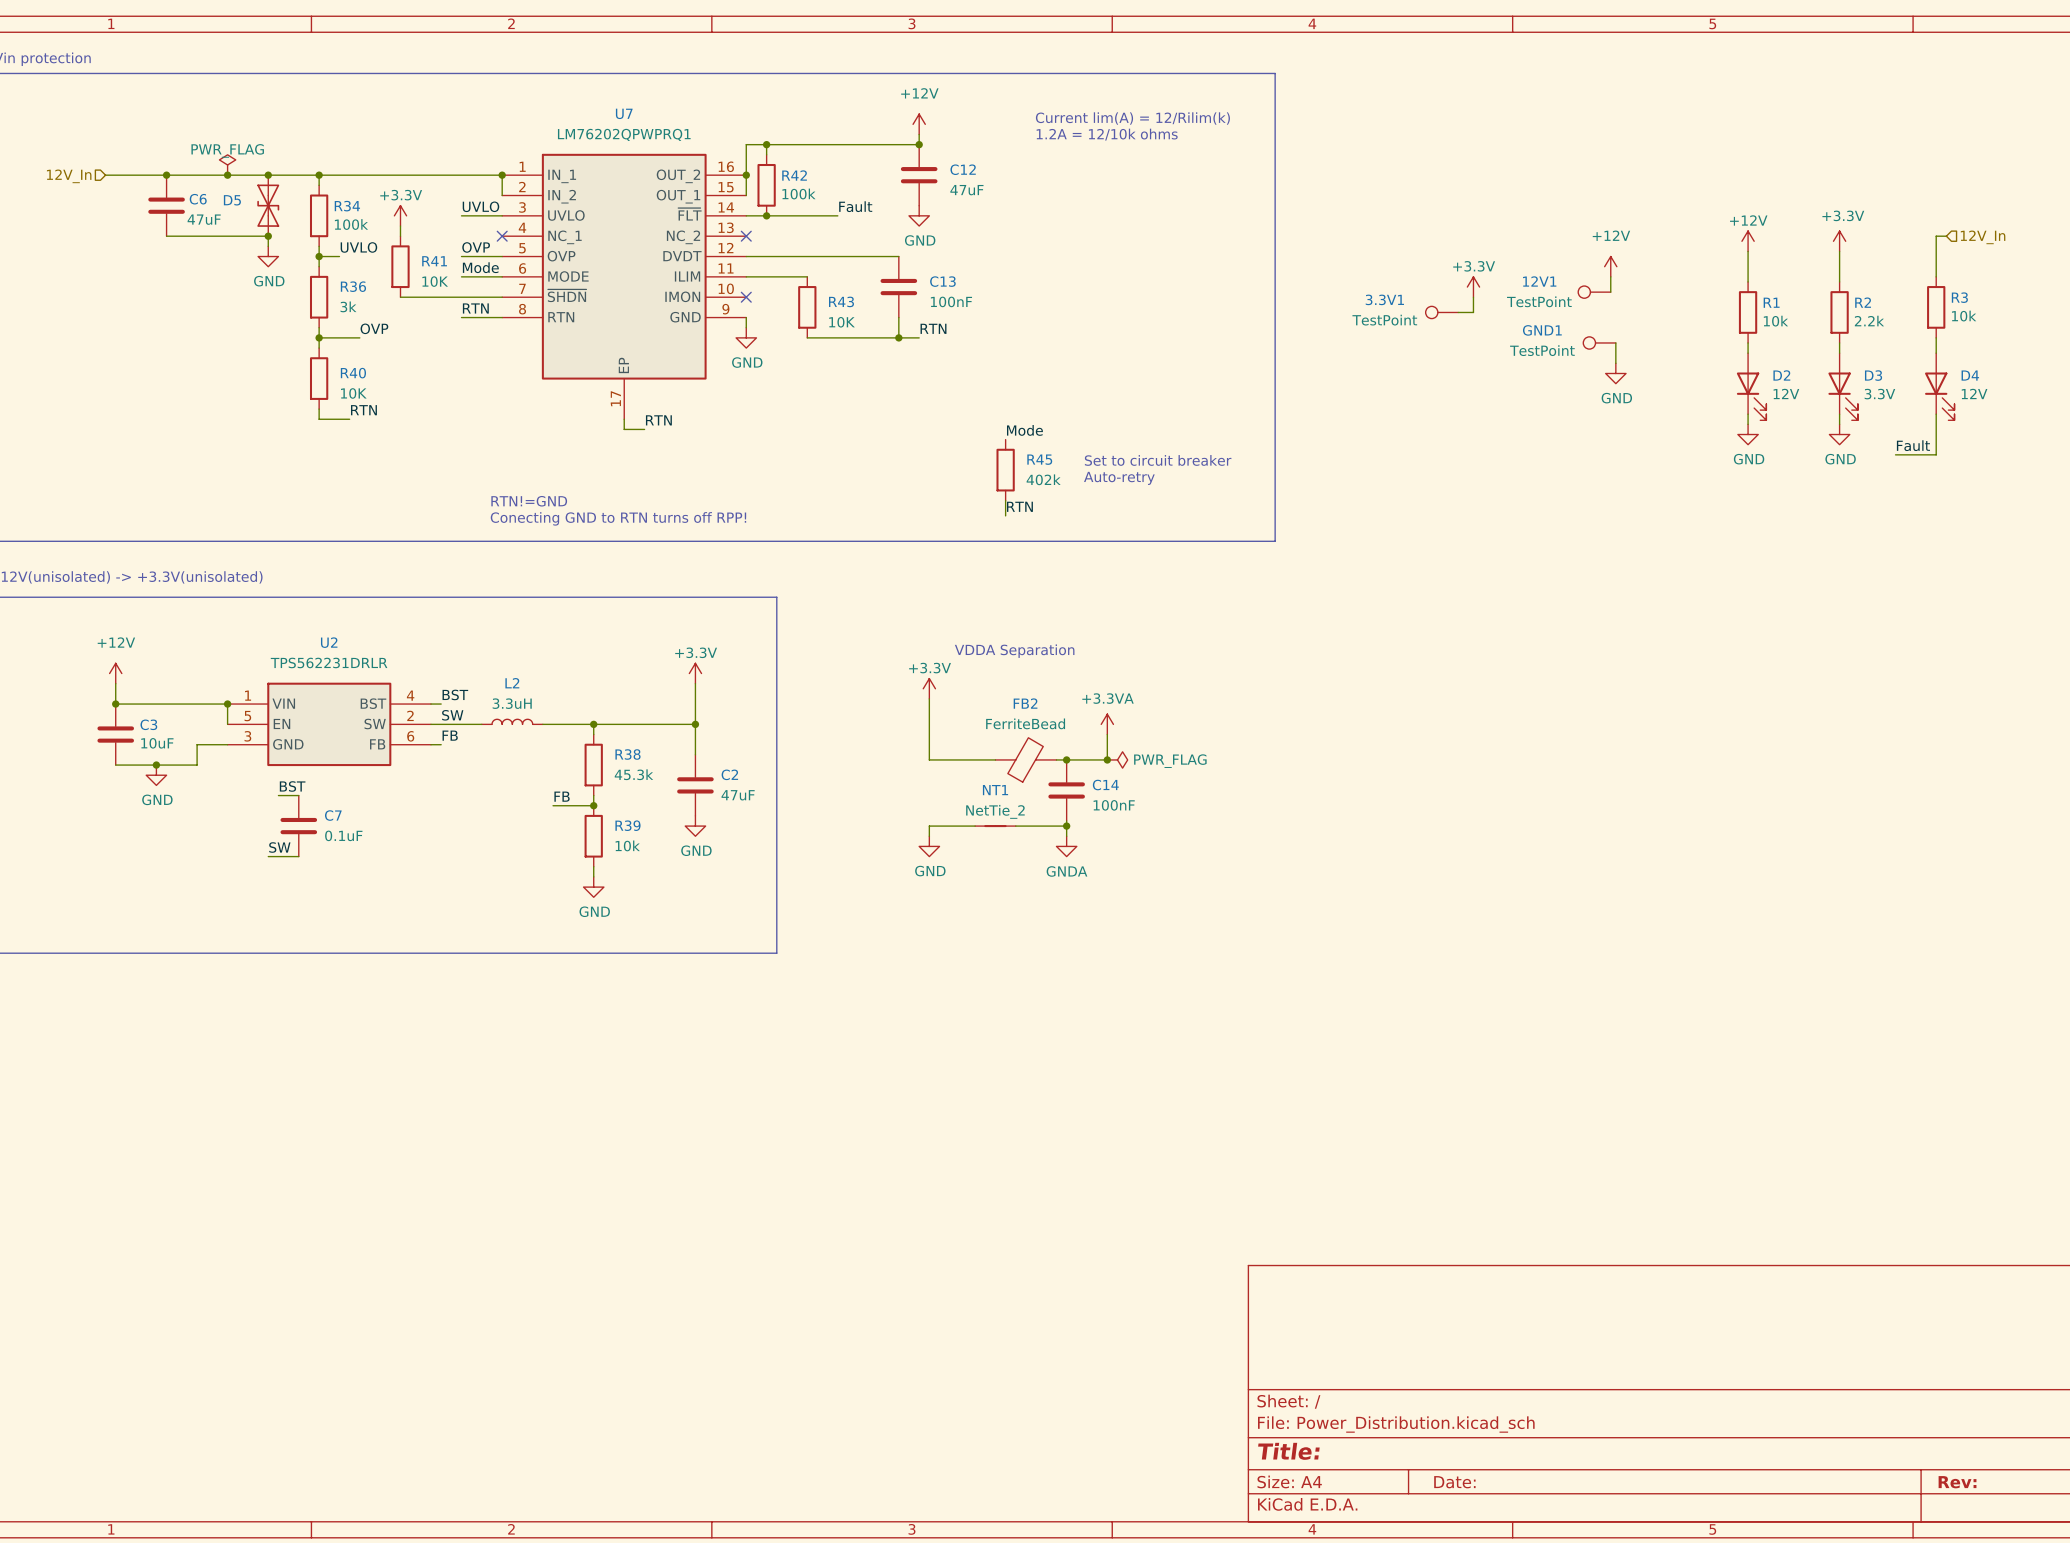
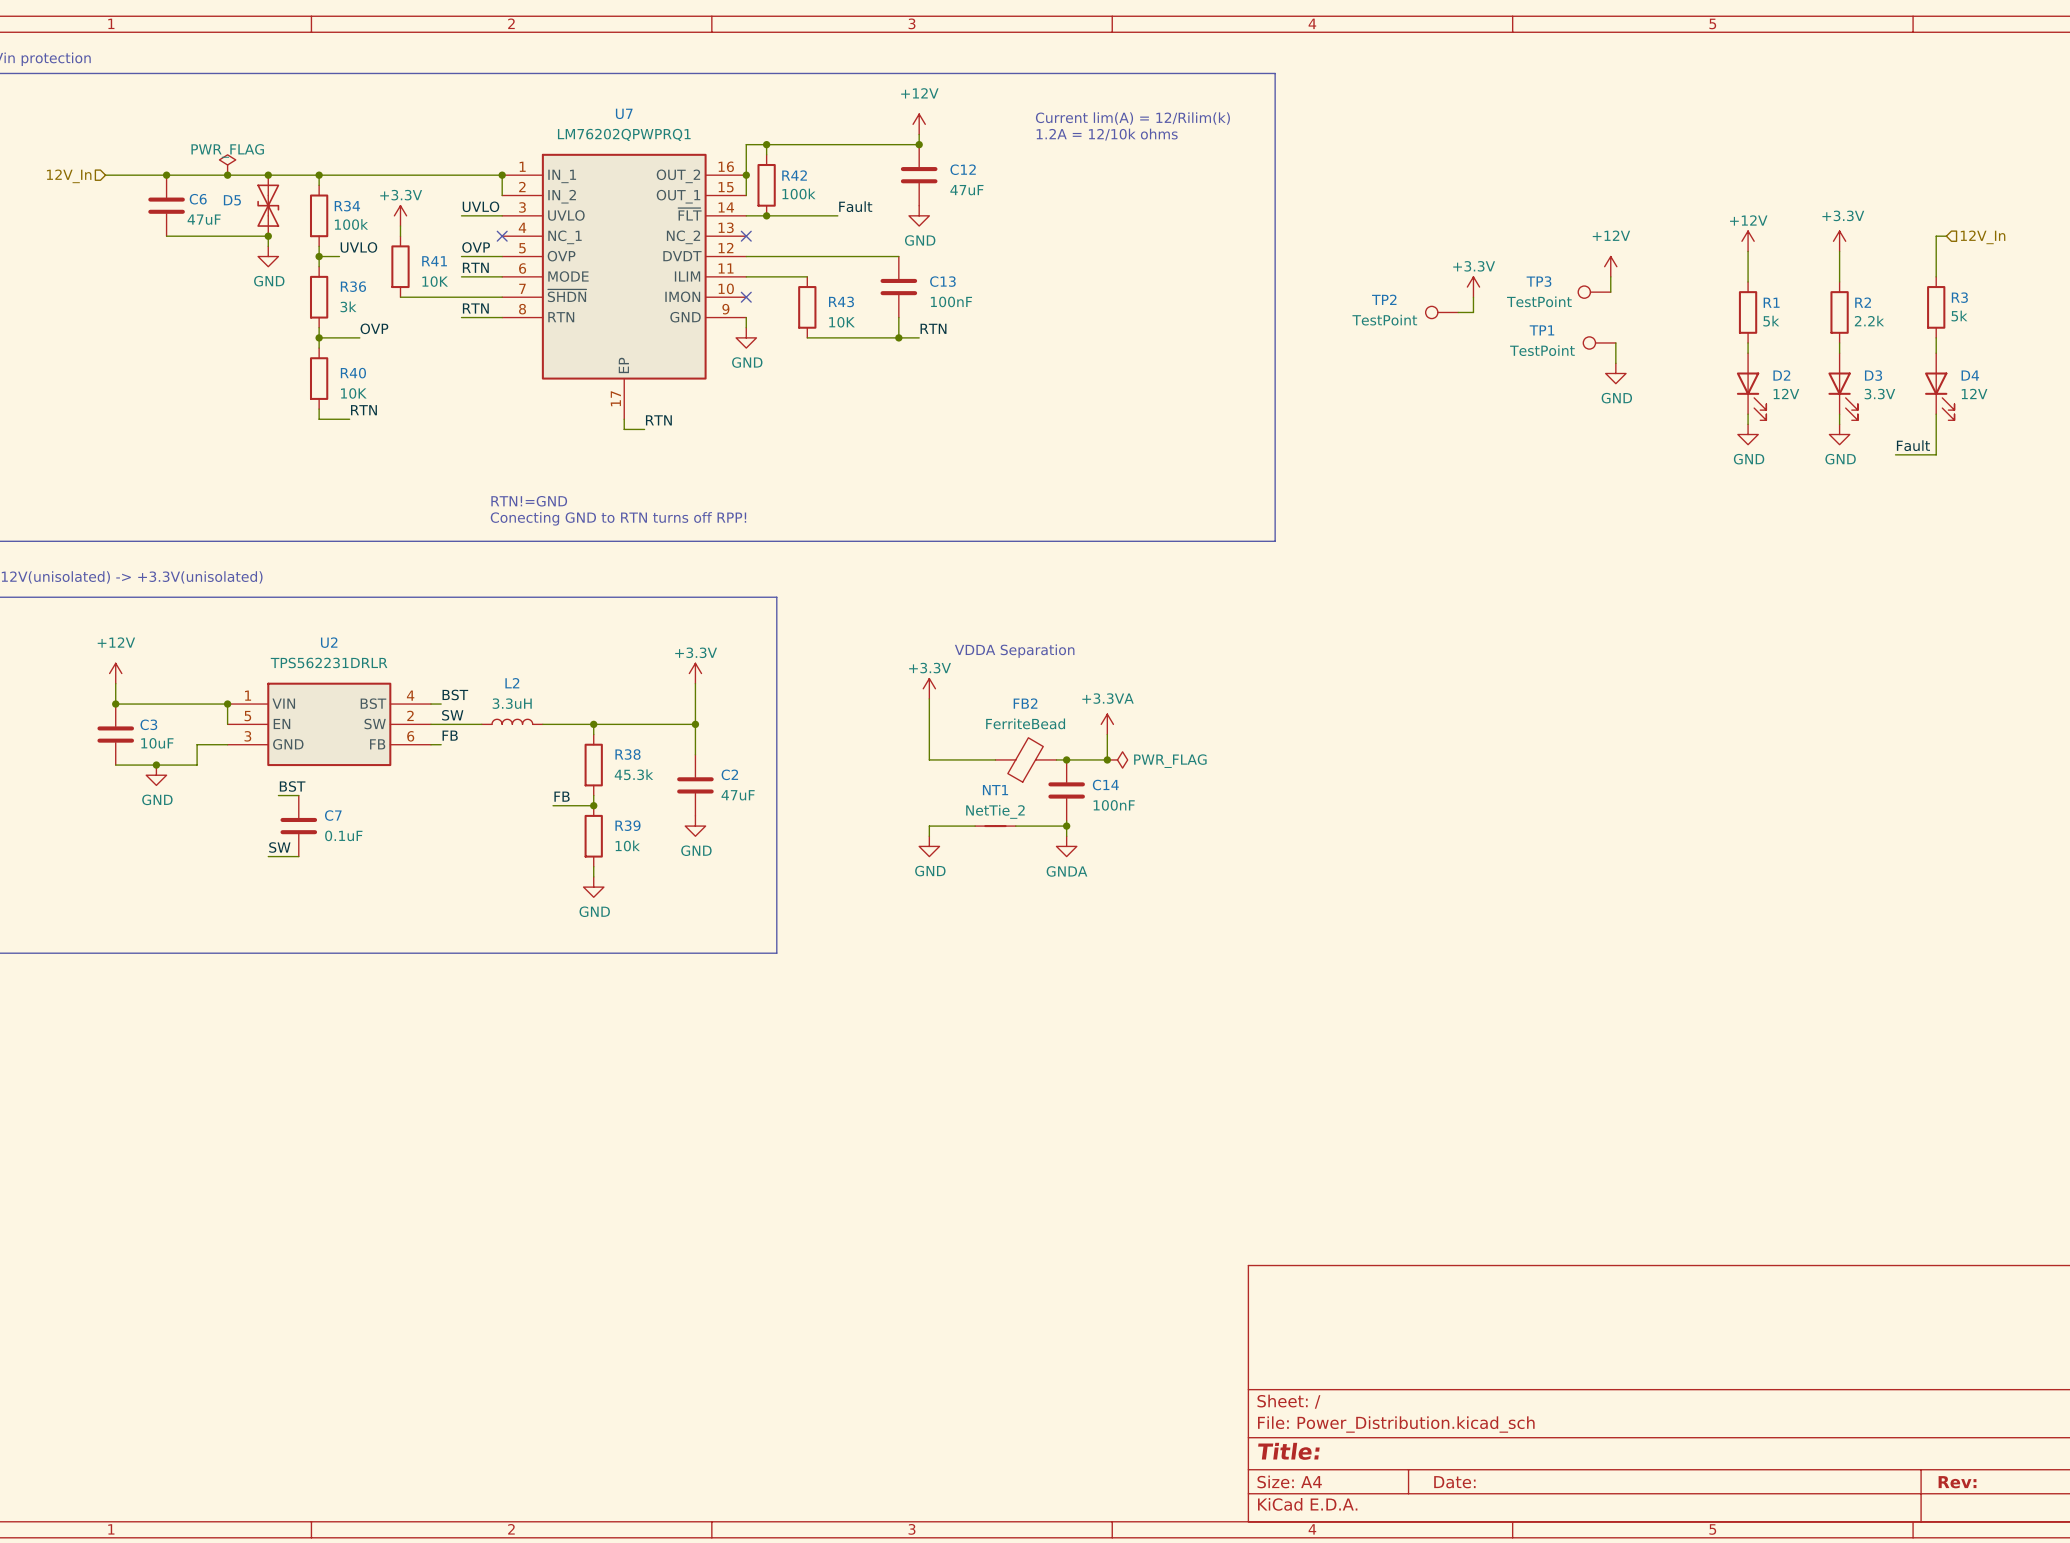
label: Mode (480, 267) -> RTN (475, 267)
12V1 name: 12V1 (1539, 281) -> TP3 (1538, 281)
3.3V1 name: 3.3V1 (1384, 299) -> TP2 (1384, 299)
R3 value: 10k (1964, 316) -> 5k (1959, 316)
R1 value: 10k (1775, 321) -> 5k (1771, 321)
GND1 name: GND1 (1542, 330) -> TP1 (1541, 330)
label: Mode (1024, 430) -> none
text: Set to circuit breaker (1158, 460) -> none
R45: 402k (1005, 470) -> none
text: Auto-retry (1119, 478) -> none
wire: (1005, 500) (1005, 515) -> none
label: RTN (1019, 506) -> none

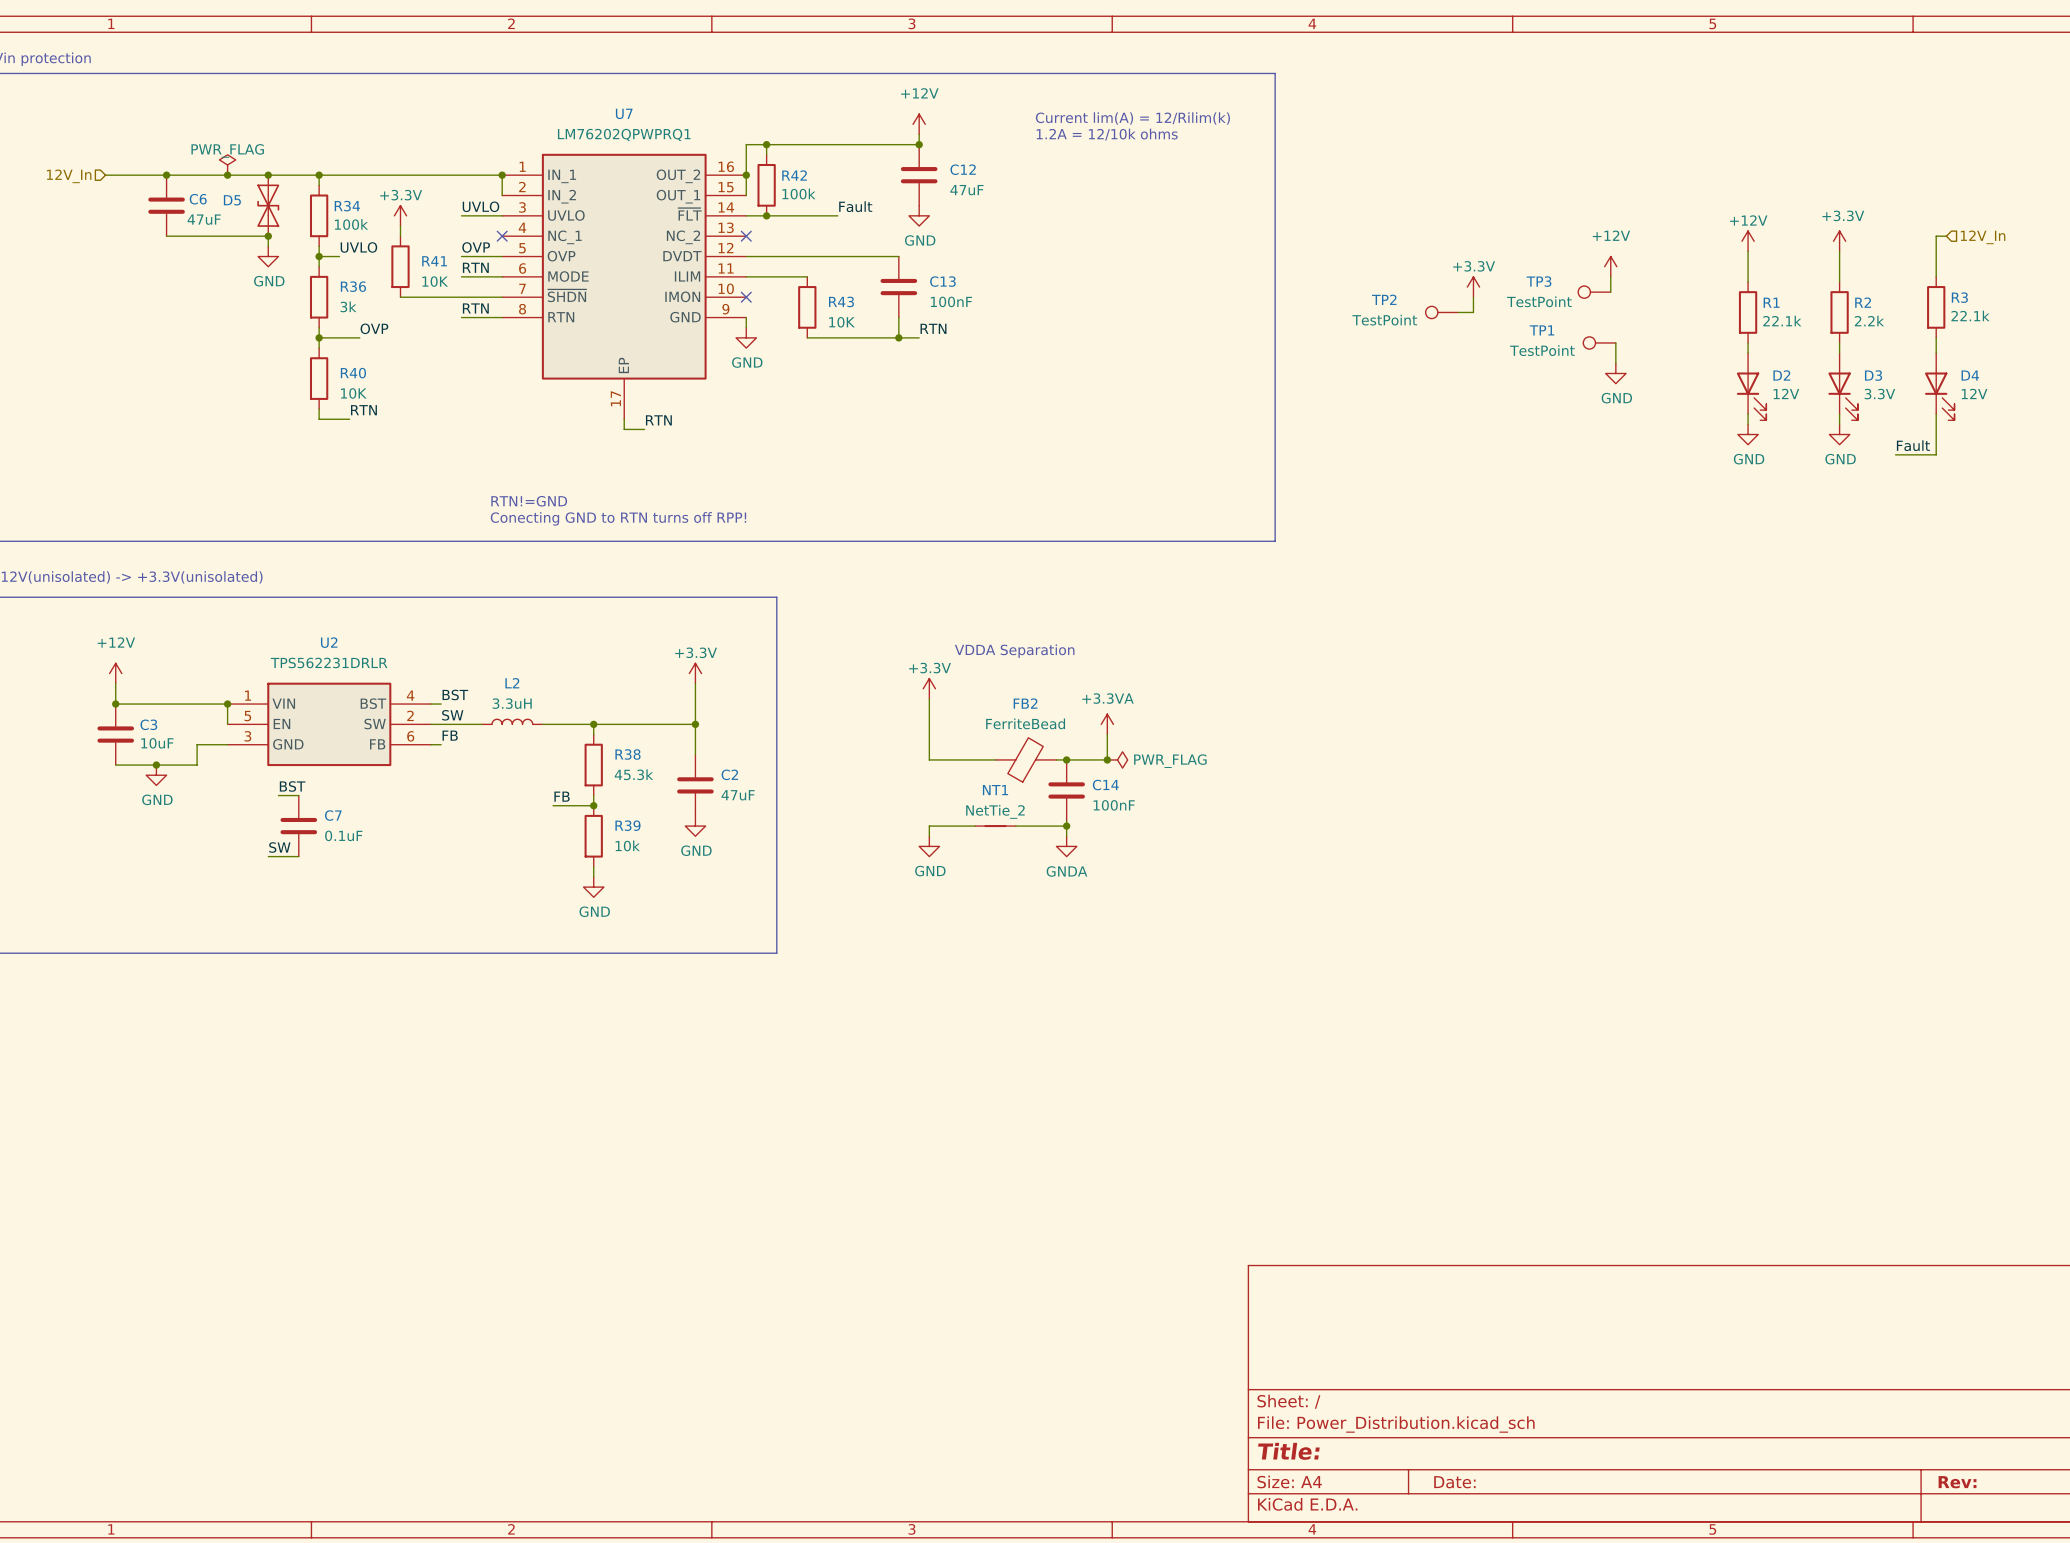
R3 value: 5k (1959, 316) -> 22.1k (1970, 315)
R1 value: 5k (1771, 321) -> 22.1k (1782, 321)

